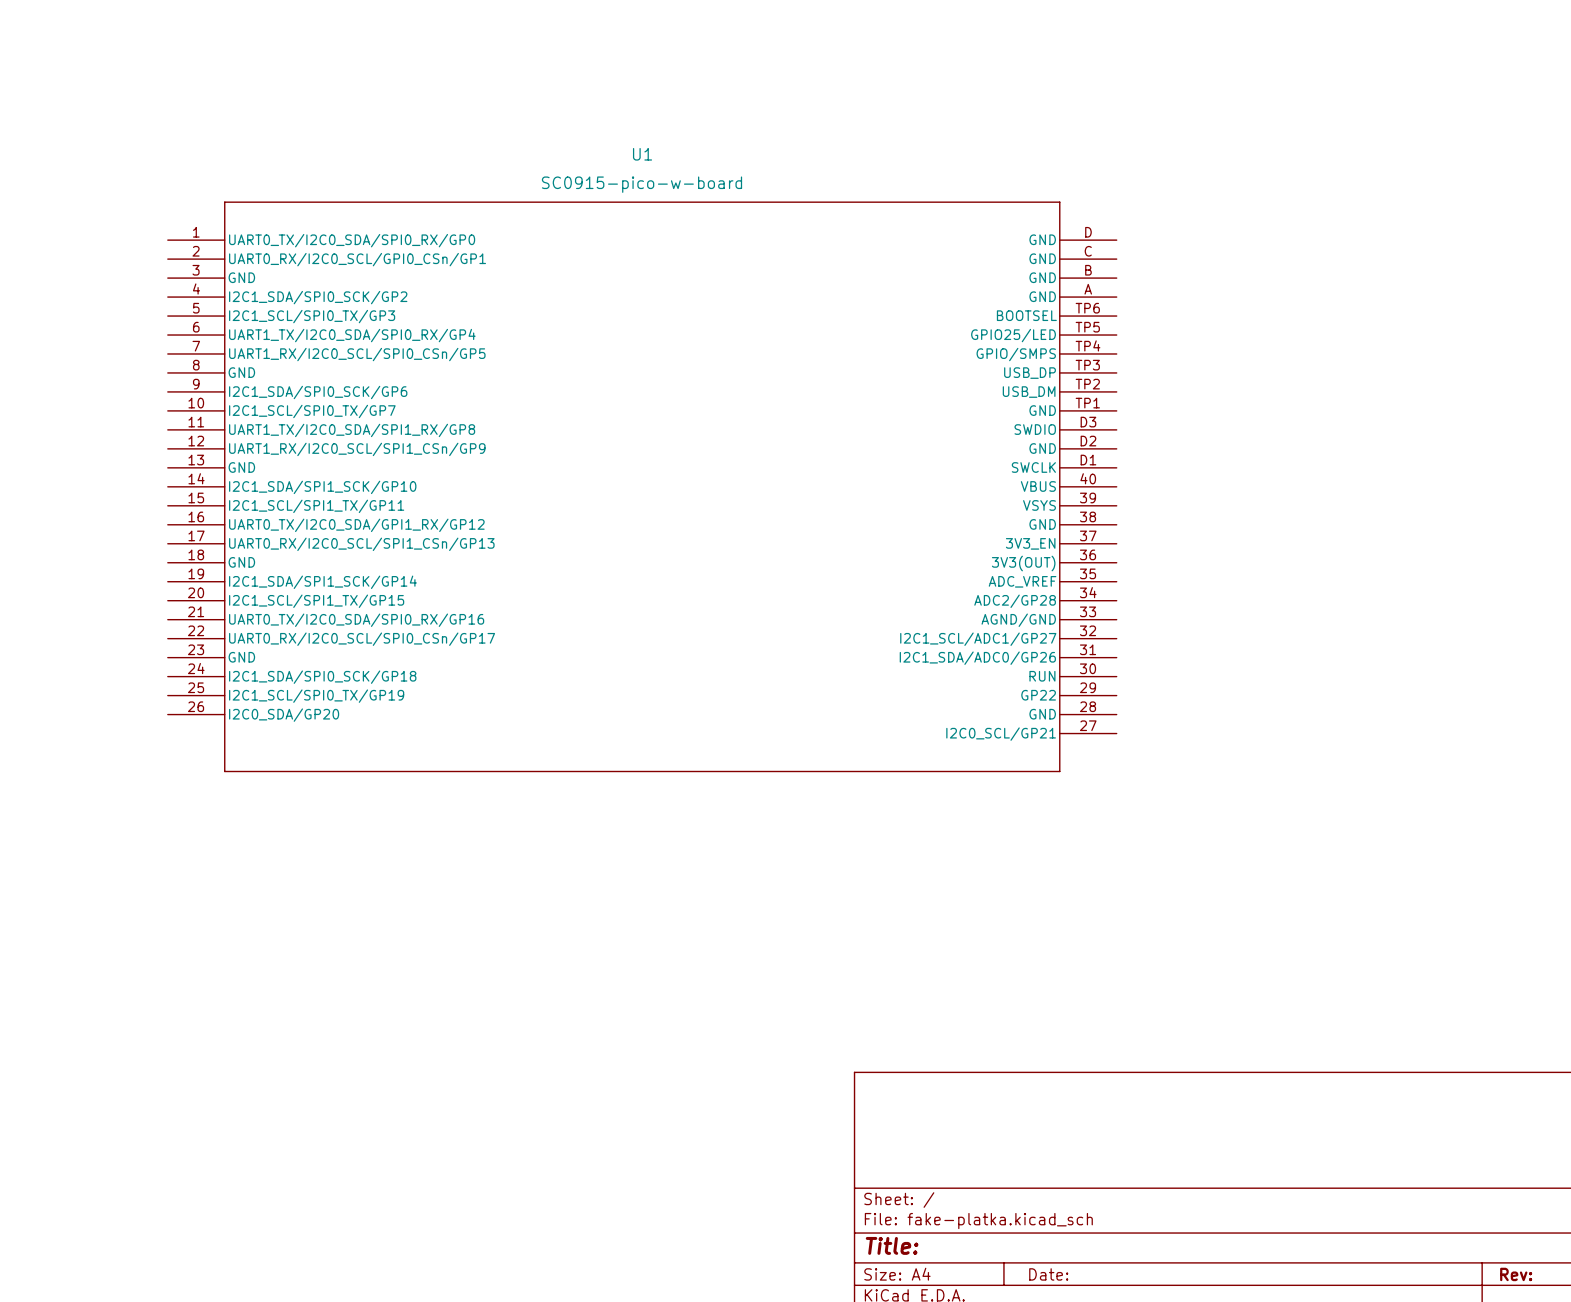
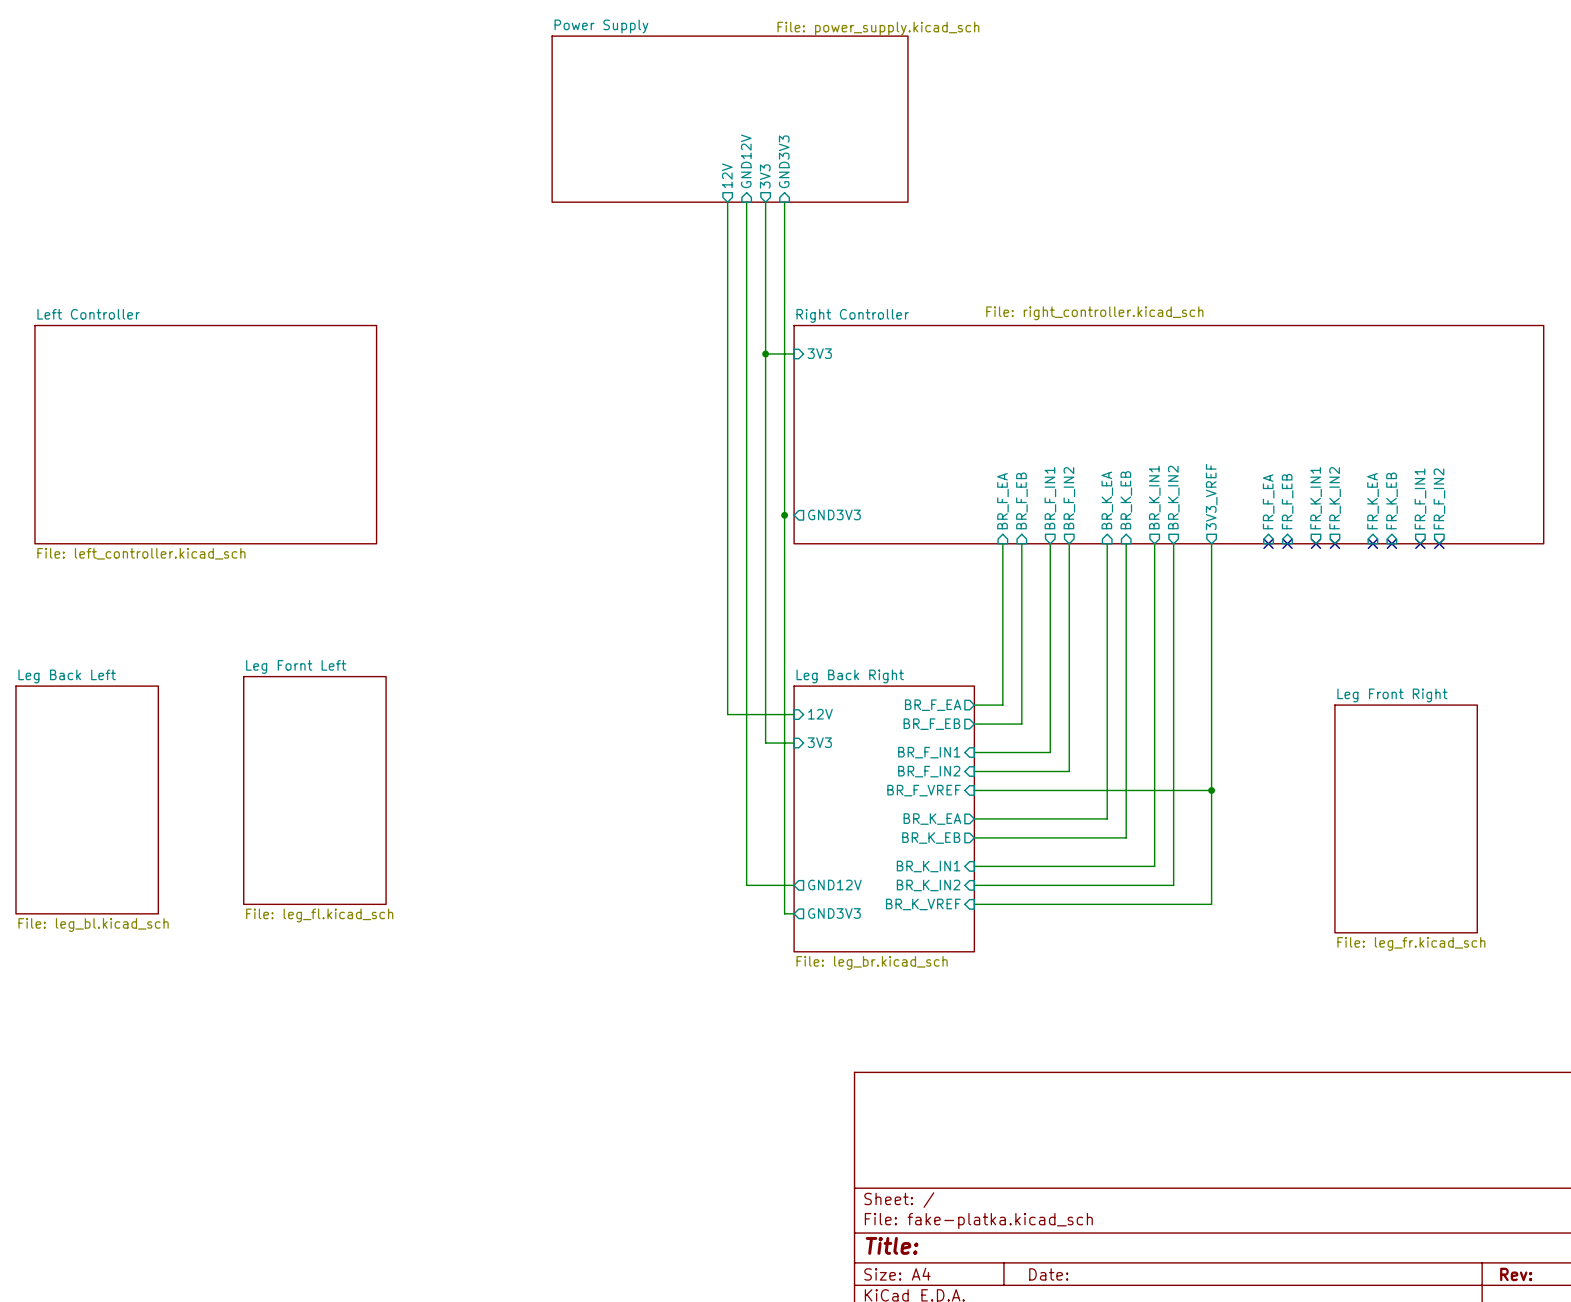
sheet Power Supply: none -> File: power_supply.kicad_sch (730, 119)
sheet pin: none -> GND12V (746, 161)
sheet pin: none -> GND3V3 (784, 161)
sheet pin: none -> 12V (727, 175)
sheet pin: none -> 3V3 (765, 176)
wire: none -> (727, 202) (727, 714) (794, 714)
wire: none -> (746, 202) (746, 885) (794, 885)
wire: none -> (765, 202) (765, 743) (794, 743)
wire: none -> (784, 202) (784, 913) (794, 913)
wire: none -> (765, 353) (794, 353)
junction: none -> (765, 353)
sheet pin: none -> 3V3 (819, 353)
sheet Left Controller: none -> File: left_controller.kicad_sch (205, 434)
sheet Right Controller: none -> File: right_controller.kicad_sch (1168, 434)
U1: SC0915-pico-w-board (642, 486) -> none
sheet pin: none -> BR_K_IN1 (1154, 497)
sheet pin: none -> BR_K_IN2 (1173, 497)
sheet pin: none -> 3V3_VREF (1211, 497)
sheet pin: none -> BR_F_IN1 (1050, 498)
sheet pin: none -> BR_F_IN2 (1069, 498)
sheet pin: none -> FR_K_IN1 (1316, 498)
sheet pin: none -> FR_K_IN2 (1335, 498)
sheet pin: none -> FR_F_IN1 (1420, 498)
sheet pin: none -> FR_F_IN2 (1439, 498)
sheet pin: none -> BR_F_EB (1021, 500)
sheet pin: none -> BR_K_EA (1107, 500)
sheet pin: none -> BR_K_EB (1126, 500)
sheet pin: none -> FR_K_EB (1391, 500)
sheet pin: none -> BR_F_EA (1002, 501)
sheet pin: none -> FR_F_EA (1268, 501)
sheet pin: none -> FR_F_EB (1287, 501)
sheet pin: none -> FR_K_EA (1373, 501)
sheet pin: none -> GND3V3 (834, 514)
junction: none -> (784, 515)
wire: none -> (1002, 543) (1002, 705) (974, 705)
wire: none -> (1021, 543) (1021, 724) (974, 724)
wire: none -> (1050, 543) (1050, 752) (974, 752)
wire: none -> (1069, 543) (1069, 771) (974, 771)
wire: none -> (1107, 543) (1107, 818) (974, 818)
wire: none -> (1126, 543) (1126, 837) (974, 837)
wire: none -> (1154, 543) (1154, 866) (974, 866)
wire: none -> (1173, 543) (1173, 885) (974, 885)
wire: none -> (1211, 543) (1211, 904) (974, 904)
no-connect mark: none -> (1268, 543)
no-connect mark: none -> (1287, 543)
no-connect mark: none -> (1315, 543)
no-connect mark: none -> (1334, 543)
no-connect mark: none -> (1372, 543)
no-connect mark: none -> (1391, 543)
no-connect mark: none -> (1420, 543)
no-connect mark: none -> (1439, 543)
sheet pin: none -> BR_F_EA (933, 705)
sheet pin: none -> 12V (820, 714)
sheet pin: none -> BR_F_EB (931, 724)
sheet pin: none -> 3V3 (819, 742)
sheet pin: none -> BR_F_IN1 (929, 752)
sheet pin: none -> BR_F_IN2 (929, 771)
sheet Leg Fornt Left: none -> File: leg_fl.kicad_sch (314, 790)
sheet pin: none -> BR_F_VREF (924, 790)
wire: none -> (974, 790) (1211, 790)
junction: none -> (1211, 790)
sheet Leg Back Left: none -> File: leg_bl.kicad_sch (87, 799)
sheet Leg Back Right: none -> File: leg_br.kicad_sch (884, 818)
sheet Leg Front Right: none -> File: leg_fr.kicad_sch (1406, 818)
sheet pin: none -> BR_K_EA (932, 819)
sheet pin: none -> BR_K_EB (931, 838)
sheet pin: none -> BR_K_IN1 (928, 866)
sheet pin: none -> GND12V (834, 885)
sheet pin: none -> BR_K_IN2 (928, 885)
sheet pin: none -> BR_K_VREF (923, 904)
sheet pin: none -> GND3V3 (834, 913)

